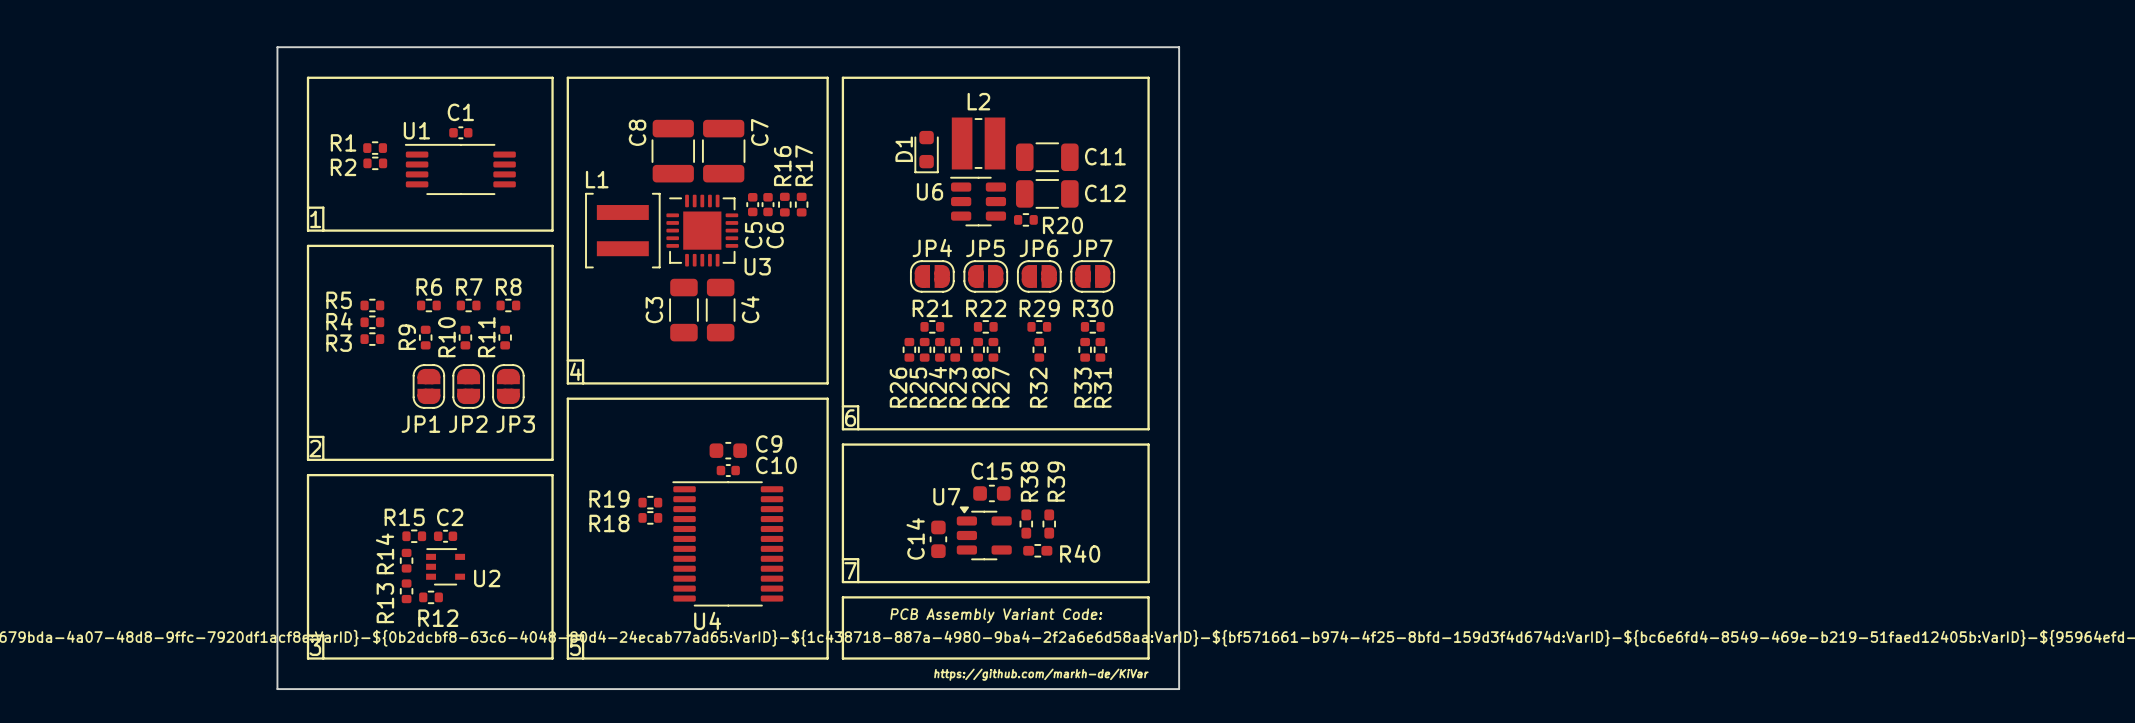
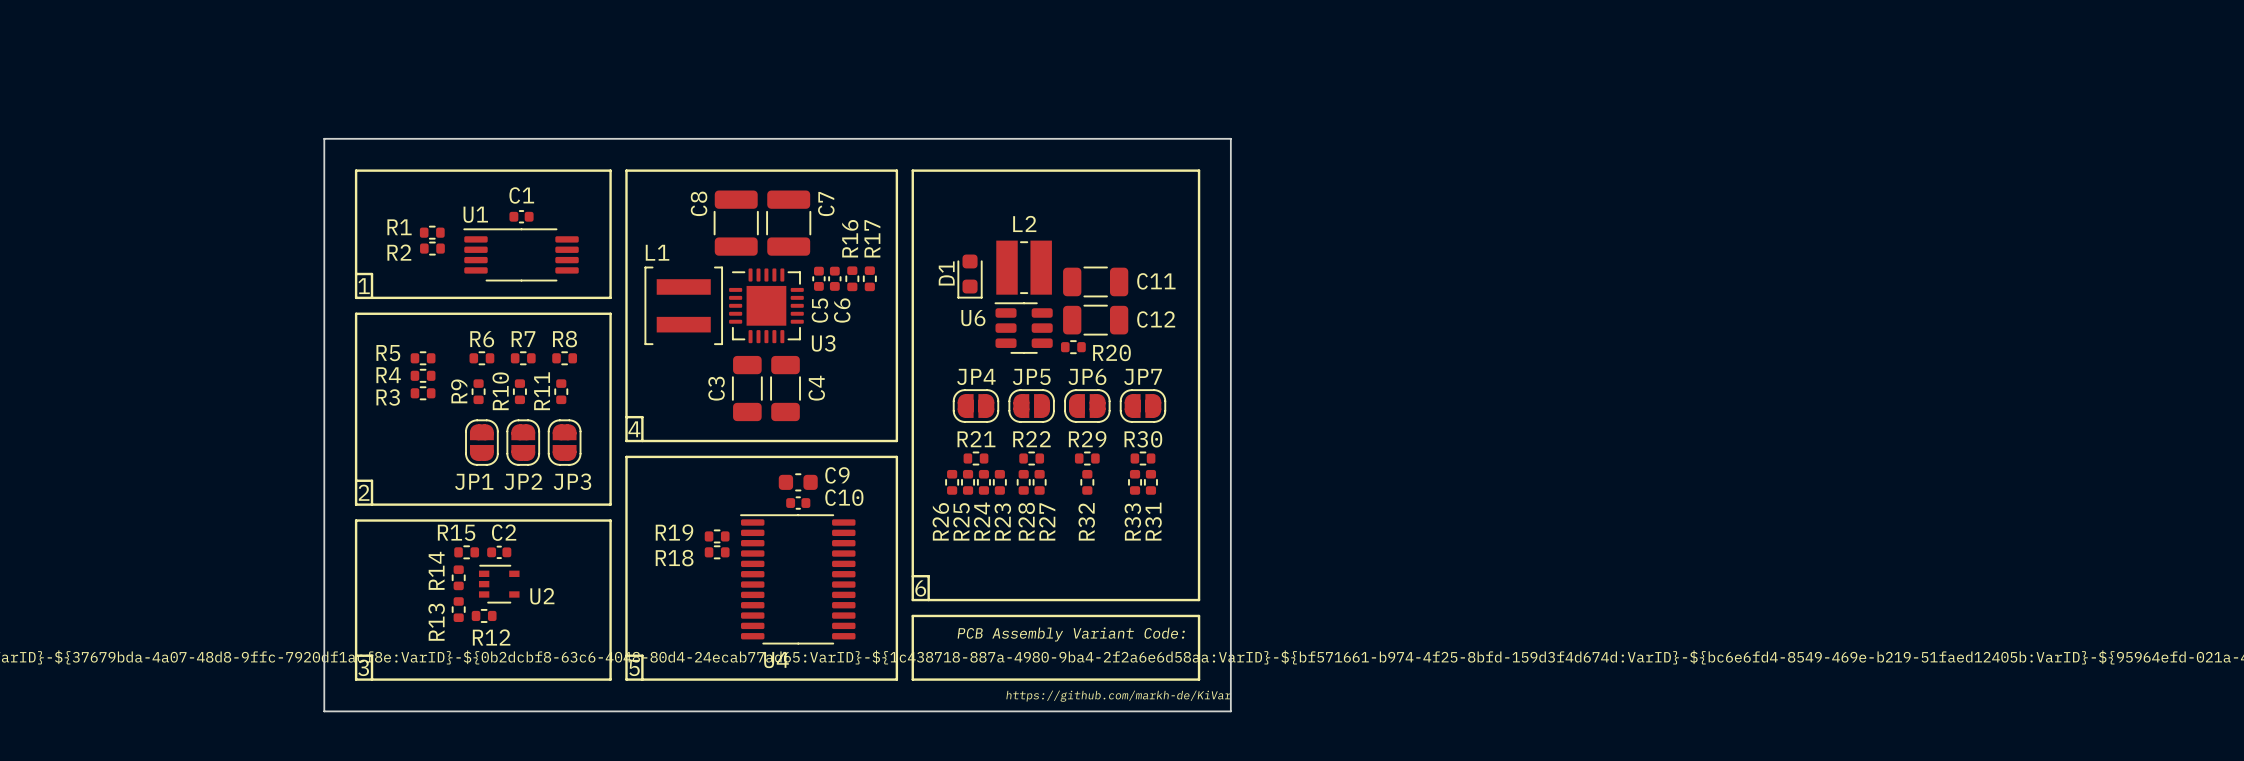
C1 position: (460, 132) -> (521, 216)
board edge: (277, 138) (277, 47) (1179, 47) (1179, 689) (1148, 689) -> (324, 138) (1230, 138) (1230, 711)
L2 position: (978, 143) -> (1024, 267)
R1 position: (375, 148) -> (432, 232)
C8 position: (673, 151) -> (736, 223)
C7 position: (723, 151) -> (788, 223)
D1 position: (926, 152) -> (970, 276)
C11 position: (1047, 157) -> (1095, 281)
R2 position: (375, 163) -> (432, 248)
line: (308, 169) (308, 77) (552, 77) (552, 169) -> (356, 170) (610, 170)
U1 position: (460, 169) -> (521, 254)
line: (567, 169) (567, 77) (827, 77) (827, 169) -> (626, 170) (896, 170)
line: (842, 169) (842, 77) (1148, 77) (1148, 429) (842, 429) -> (912, 456) (912, 441)
C12 position: (1047, 193) -> (1095, 320)
U6 position: (978, 201) -> (1023, 328)
C5 position: (752, 204) -> (818, 278)
C6 position: (768, 204) -> (834, 278)
R16 position: (784, 204) -> (852, 278)
R17 position: (801, 204) -> (869, 278)
line: (308, 207) (323, 207) (323, 230) -> (356, 274) (372, 274) (372, 297)
text position: 1 (315, 219) -> 1 (364, 286)
R20 position: (1025, 219) -> (1073, 347)
line: (308, 230) (552, 230) -> (356, 234) (356, 250)
L1 position: (622, 230) -> (683, 305)
U3 position: (702, 230) -> (766, 305)
line: (308, 245) (552, 245) -> (610, 234) (610, 250)
JP4 position: (932, 276) -> (975, 406)
JP5 position: (985, 276) -> (1031, 406)
JP6 position: (1039, 276) -> (1087, 406)
JP7 position: (1092, 276) -> (1142, 406)
line: (308, 291) (308, 307) -> (356, 297) (610, 297)
line: (552, 291) (552, 307) -> (356, 313) (610, 313)
R5 position: (372, 305) -> (423, 358)
R6 position: (428, 305) -> (481, 358)
R7 position: (468, 305) -> (523, 358)
R8 position: (508, 305) -> (564, 358)
C3 position: (683, 310) -> (747, 388)
C4 position: (720, 310) -> (785, 388)
R4 position: (372, 322) -> (423, 375)
R21 position: (932, 326) -> (975, 458)
R22 position: (985, 326) -> (1031, 458)
R29 position: (1039, 326) -> (1087, 458)
R30 position: (1092, 326) -> (1142, 458)
R9 position: (425, 337) -> (478, 391)
R10 position: (465, 337) -> (519, 391)
R11 position: (505, 337) -> (561, 391)
R3 position: (372, 339) -> (423, 393)
R26 position: (909, 349) -> (952, 482)
R25 position: (924, 349) -> (968, 482)
R24 position: (939, 349) -> (983, 482)
R23 position: (955, 349) -> (999, 482)
R28 position: (978, 349) -> (1023, 482)
R27 position: (993, 349) -> (1039, 482)
R32 position: (1039, 349) -> (1087, 482)
R33 position: (1085, 349) -> (1135, 482)
R31 position: (1100, 349) -> (1150, 482)
line: (567, 360) (583, 360) (583, 383) -> (626, 417) (642, 417) (642, 441)
text position: 4 (575, 371) -> 4 (634, 429)
line: (567, 383) (827, 383) -> (626, 393) (626, 409)
JP1 position: (428, 386) -> (481, 442)
JP2 position: (468, 386) -> (523, 442)
JP3 position: (508, 386) -> (564, 442)
line: (567, 398) (827, 398) -> (896, 393) (896, 409)
line: (842, 406) (858, 406) (858, 429) -> none
text: 6 (850, 418) -> none
line: (567, 429) (567, 444) -> (626, 441) (896, 441)
line: (827, 429) (827, 444) -> (626, 456) (896, 456)
line: (308, 436) (323, 436) (323, 459) -> (356, 480) (372, 480) (372, 504)
line: (842, 444) (1148, 444) (1148, 582) (1117, 582) -> (912, 170) (1199, 170) (1199, 600)
text position: 2 (315, 448) -> 2 (364, 492)
C9 position: (728, 450) -> (798, 482)
line: (308, 459) (552, 459) -> (356, 472) (356, 488)
C10 position: (728, 470) -> (798, 503)
line: (308, 475) (552, 475) -> (610, 472) (610, 488)
line: (308, 490) (308, 505) -> (356, 504) (610, 504)
line: (552, 490) (552, 505) -> (356, 520) (610, 520)
C15: (991, 493) -> none
R19 position: (650, 502) -> (717, 536)
R18 position: (650, 517) -> (717, 552)
R38: (1026, 524) -> none
R39: (1049, 524) -> none
U7: (984, 533) -> none
C14: (938, 539) -> none
U4 position: (727, 543) -> (797, 579)
R40: (1037, 550) -> none
text: 7 (850, 570) -> 6 (920, 588)
line: (1117, 597) (1148, 597) (1148, 658) (1117, 658) -> (1199, 615) (1199, 679)

